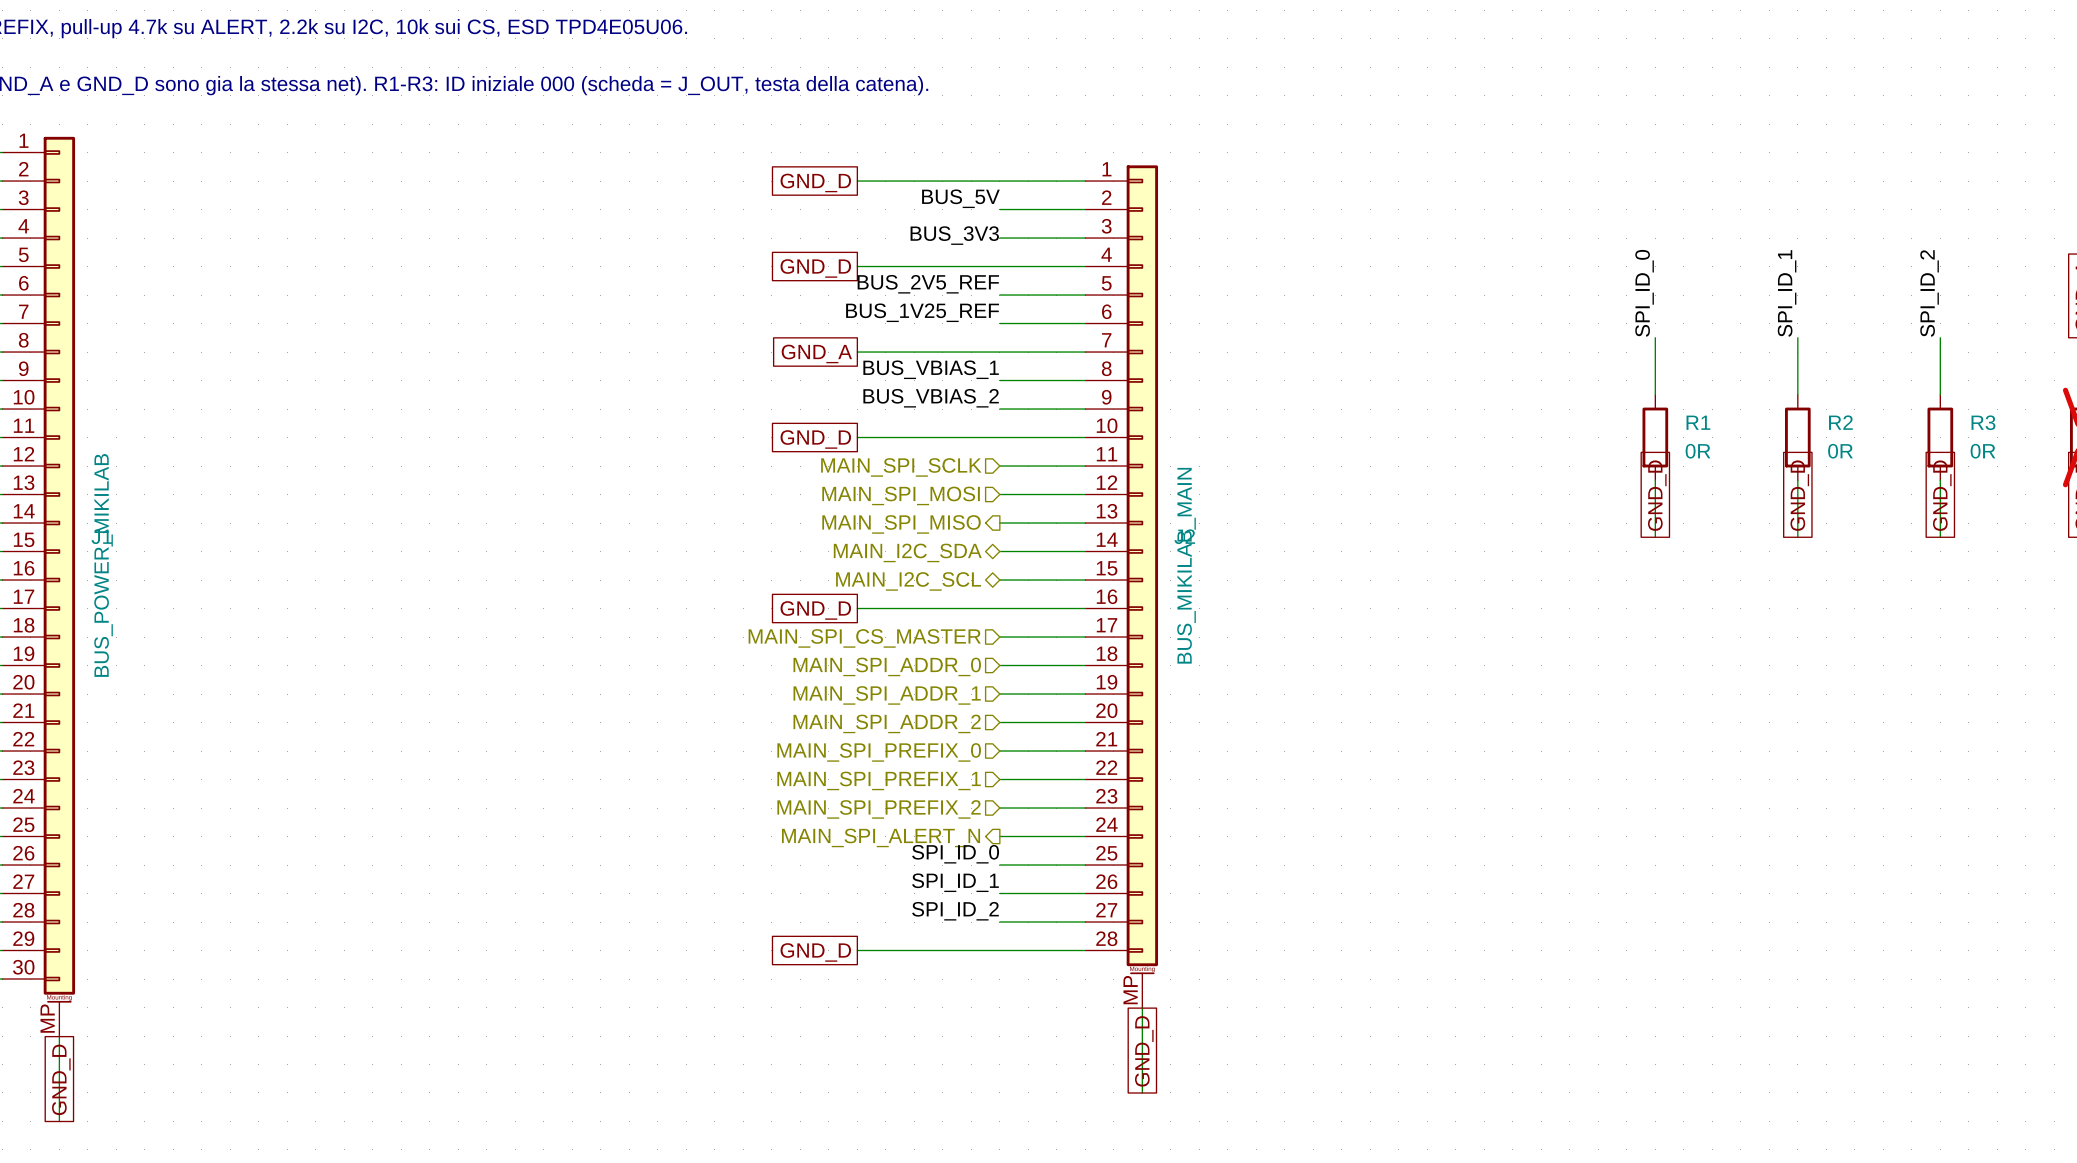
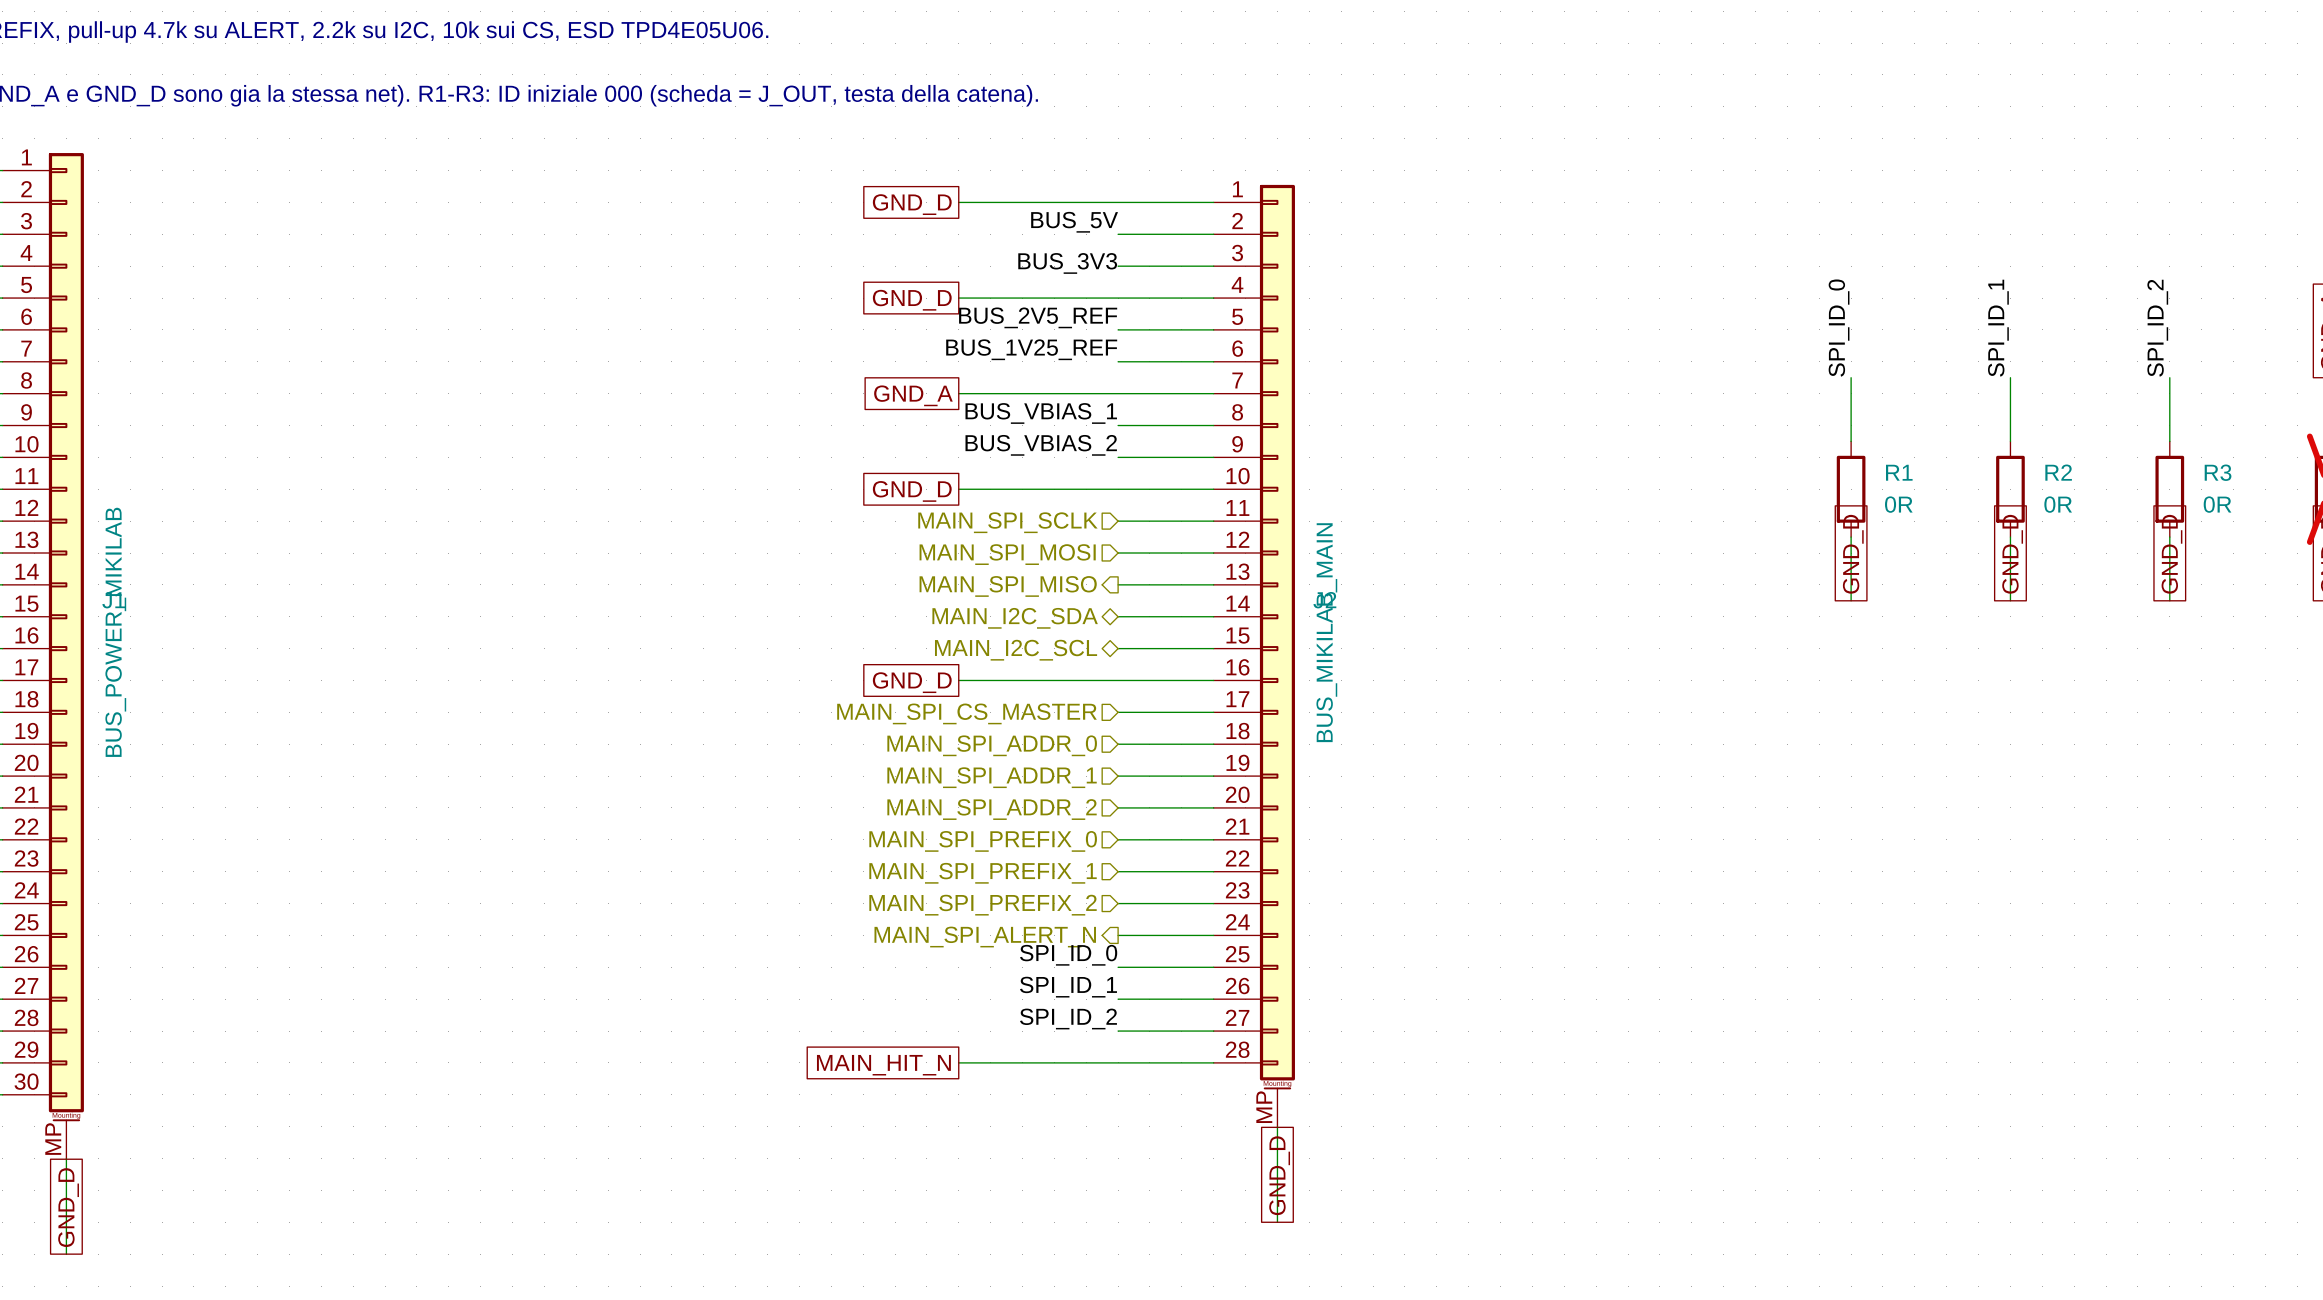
global label: GND_D (815, 952) -> MAIN_HIT_N (883, 1065)

